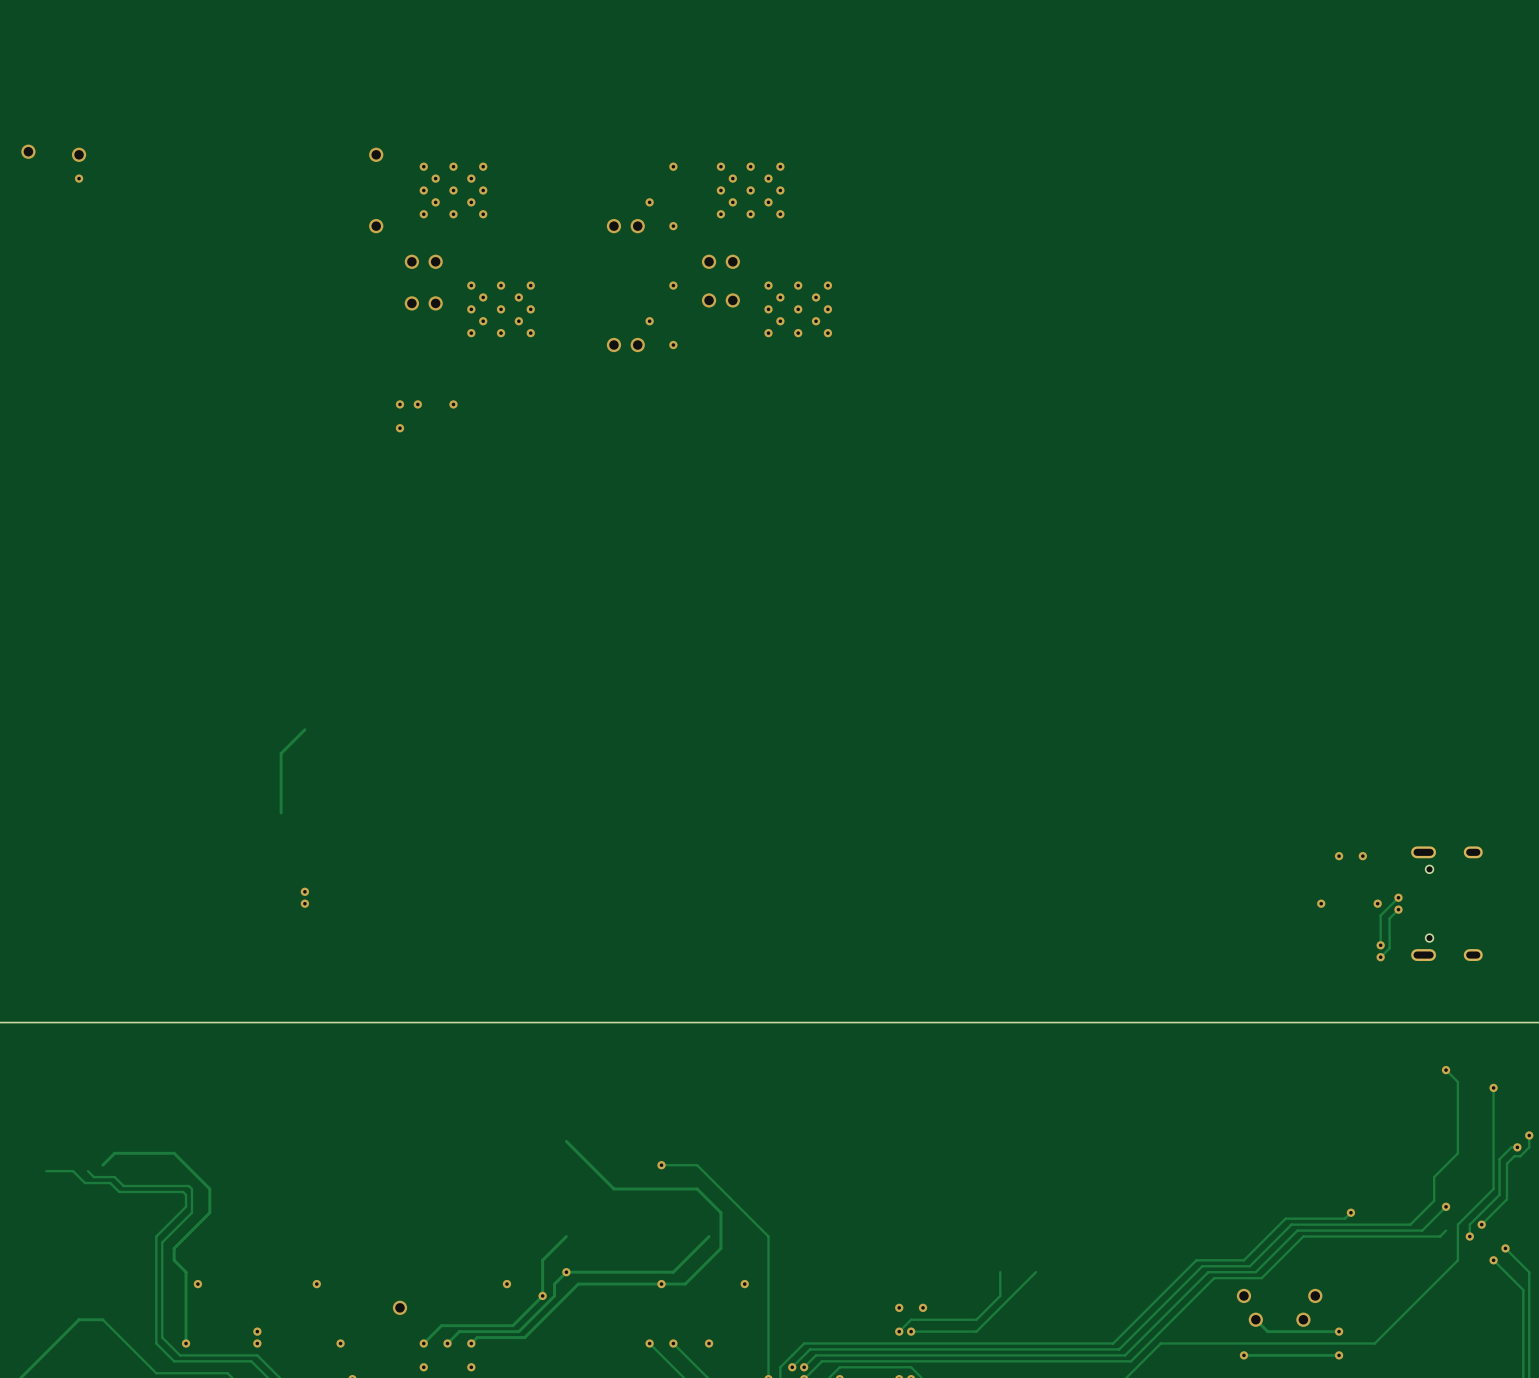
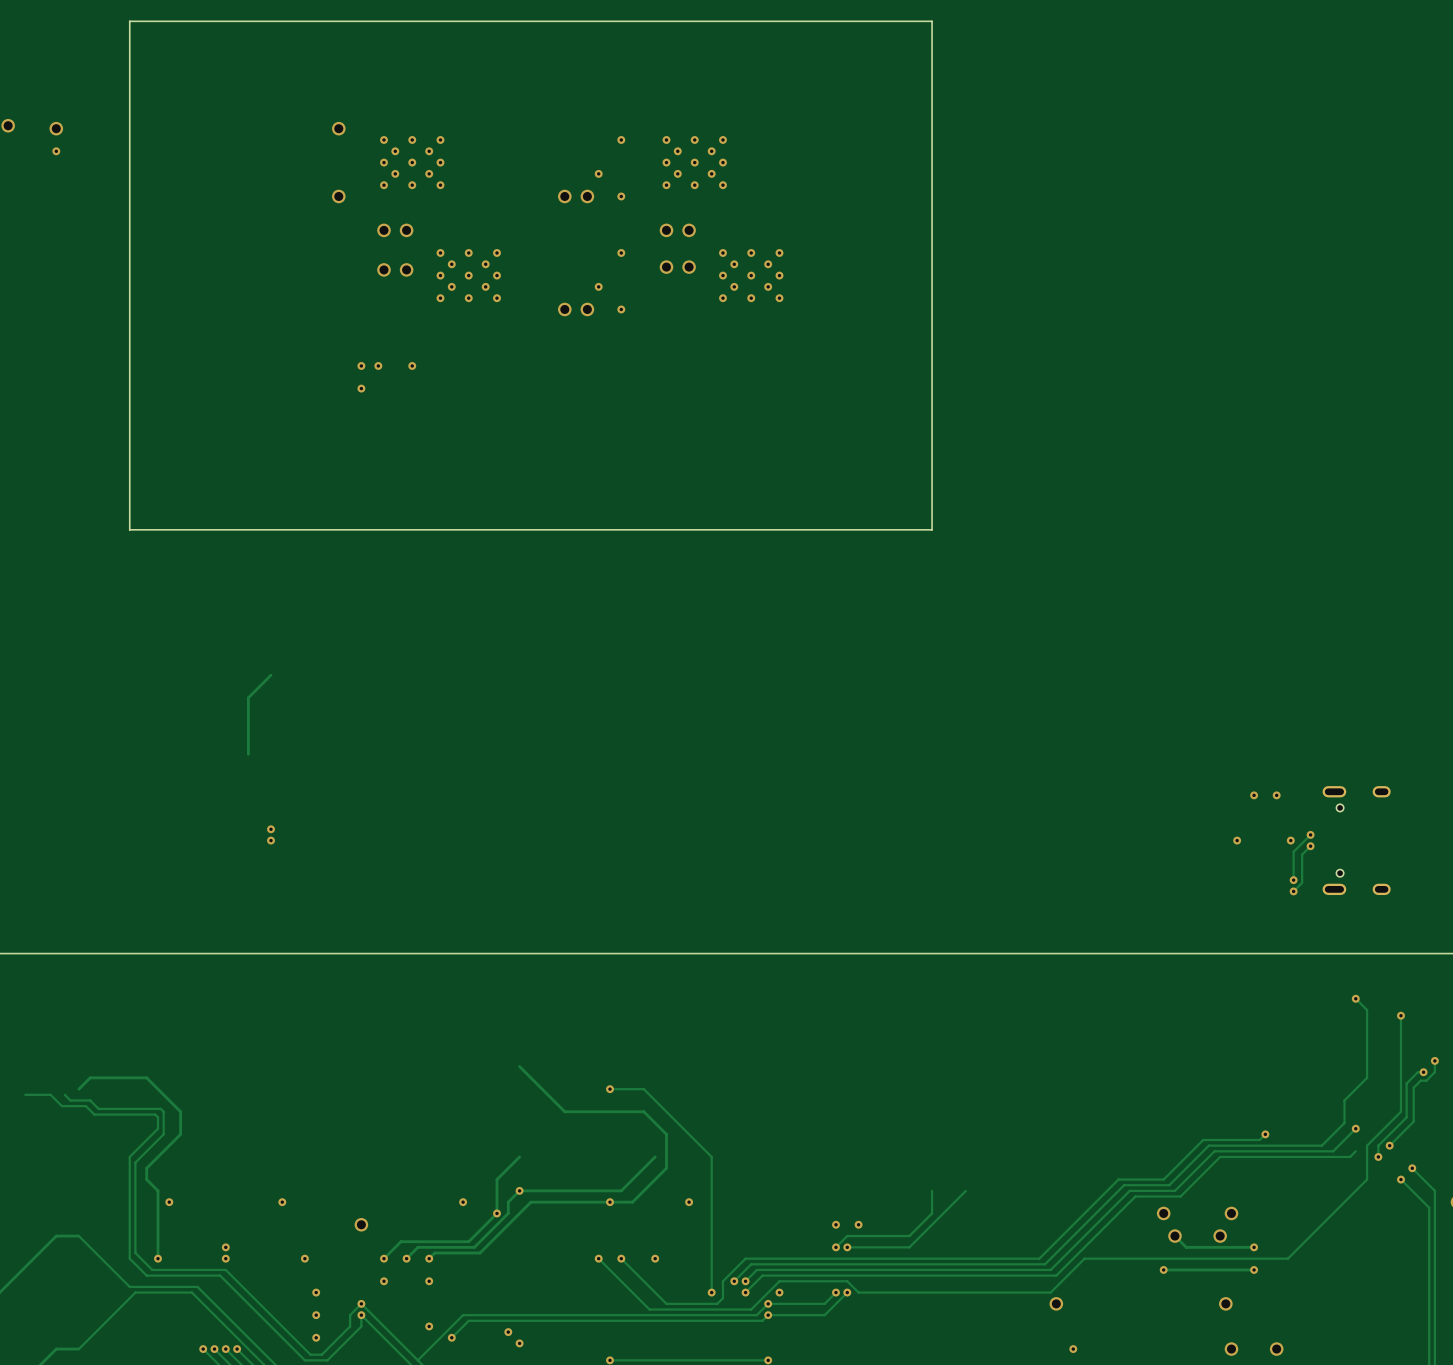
board edge: none -> (932, 21) (129, 21) (129, 529) (932, 529) (932, 21)
via: (411, 261) -> none
via: none -> (383, 230)
via: (435, 261) -> none
via: none -> (406, 230)
via: (709, 261) -> none
via: none -> (666, 230)
via: (732, 261) -> none
via: none -> (689, 230)
via: (471, 285) -> none
via: none -> (440, 252)
via: (501, 285) -> none
via: none -> (468, 252)
via: (530, 285) -> none
via: none -> (496, 252)
via: (768, 285) -> none
via: none -> (722, 252)
via: (798, 285) -> none
via: none -> (751, 252)
via: (827, 285) -> none
via: none -> (779, 252)
via: (483, 297) -> none
via: none -> (451, 264)
via: (518, 297) -> none
via: none -> (485, 264)
via: (780, 297) -> none
via: none -> (734, 264)
via: (816, 297) -> none
via: none -> (768, 264)
via: (709, 300) -> none
via: none -> (666, 267)
via: (732, 300) -> none
via: none -> (689, 267)
via: (411, 303) -> none
via: none -> (383, 269)
via: (435, 303) -> none
via: none -> (406, 269)
via: (471, 309) -> none
via: none -> (440, 275)
via: (501, 309) -> none
via: none -> (468, 275)
via: (530, 309) -> none
via: none -> (496, 275)
via: (768, 309) -> none
via: none -> (722, 275)
via: (798, 309) -> none
via: none -> (751, 275)
via: (827, 309) -> none
via: none -> (779, 275)
via: (483, 321) -> none
via: none -> (451, 286)
via: (518, 321) -> none
via: none -> (485, 286)
via: (780, 321) -> none
via: none -> (734, 286)
via: (816, 321) -> none
via: none -> (768, 286)
via: (471, 333) -> none
via: none -> (440, 298)
via: (501, 333) -> none
via: none -> (468, 298)
via: (530, 333) -> none
via: none -> (496, 298)
via: (768, 333) -> none
via: none -> (722, 298)
via: (798, 333) -> none
via: none -> (751, 298)
via: (827, 333) -> none
via: none -> (779, 298)

